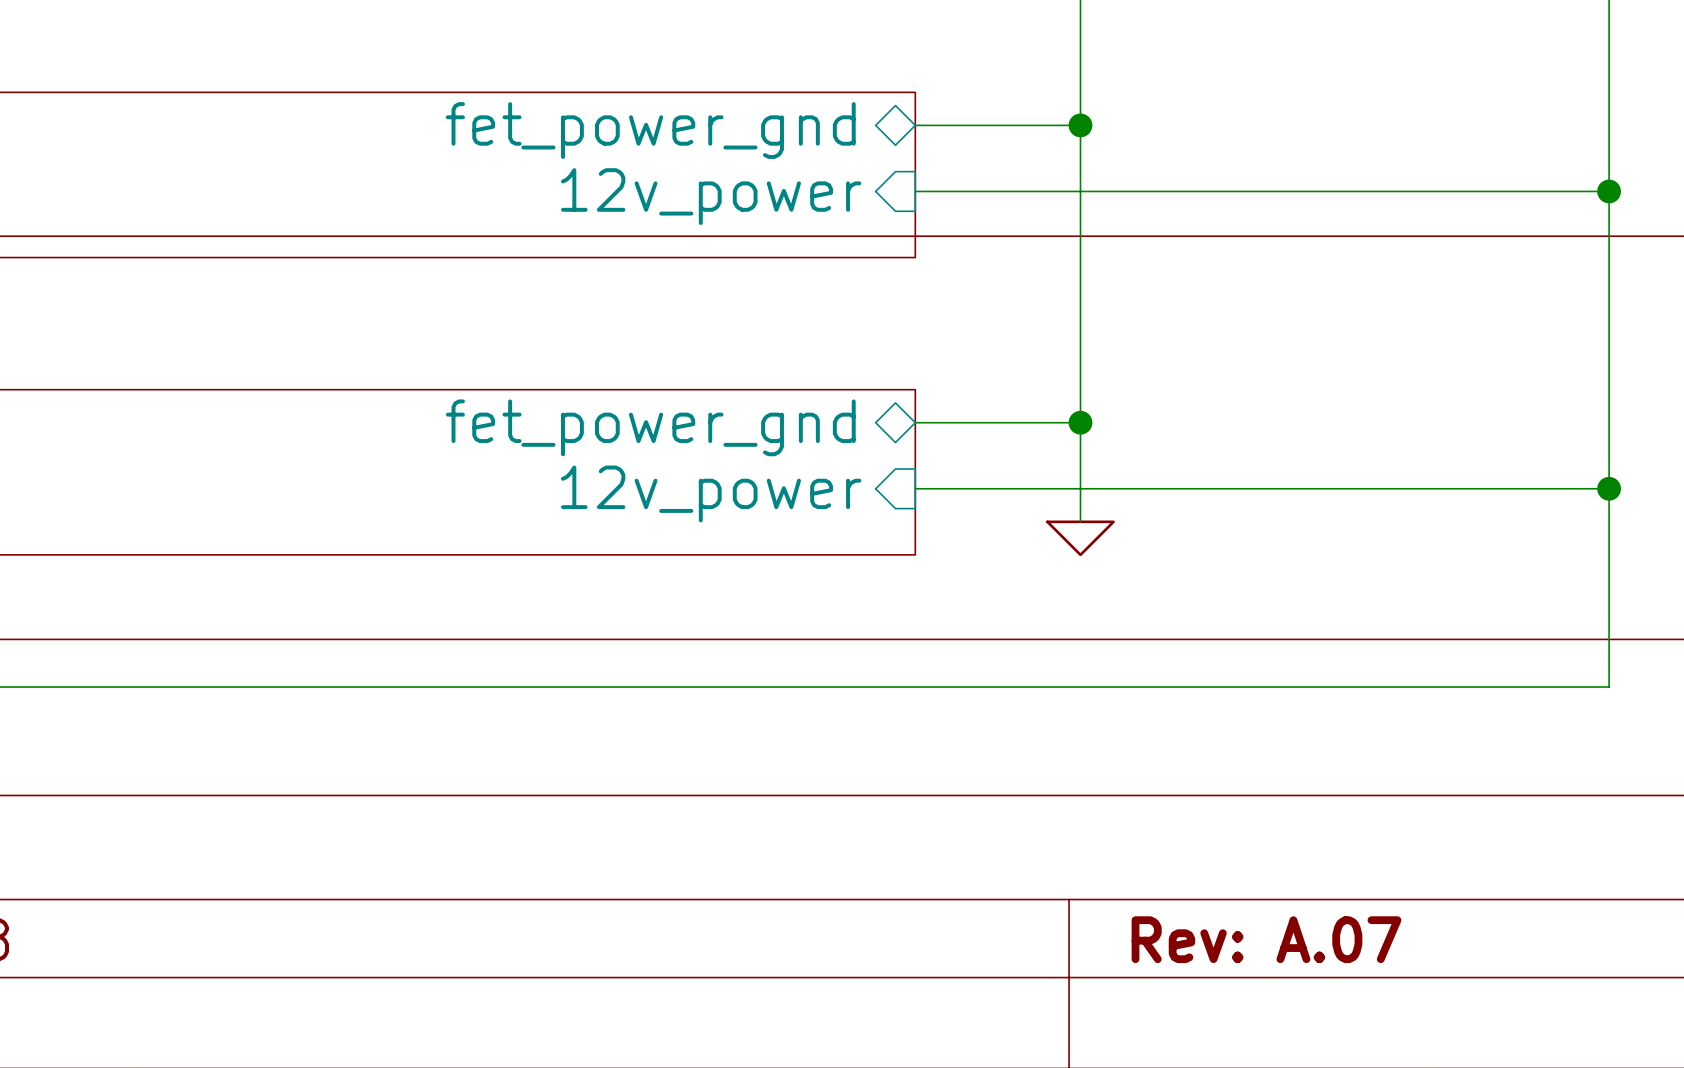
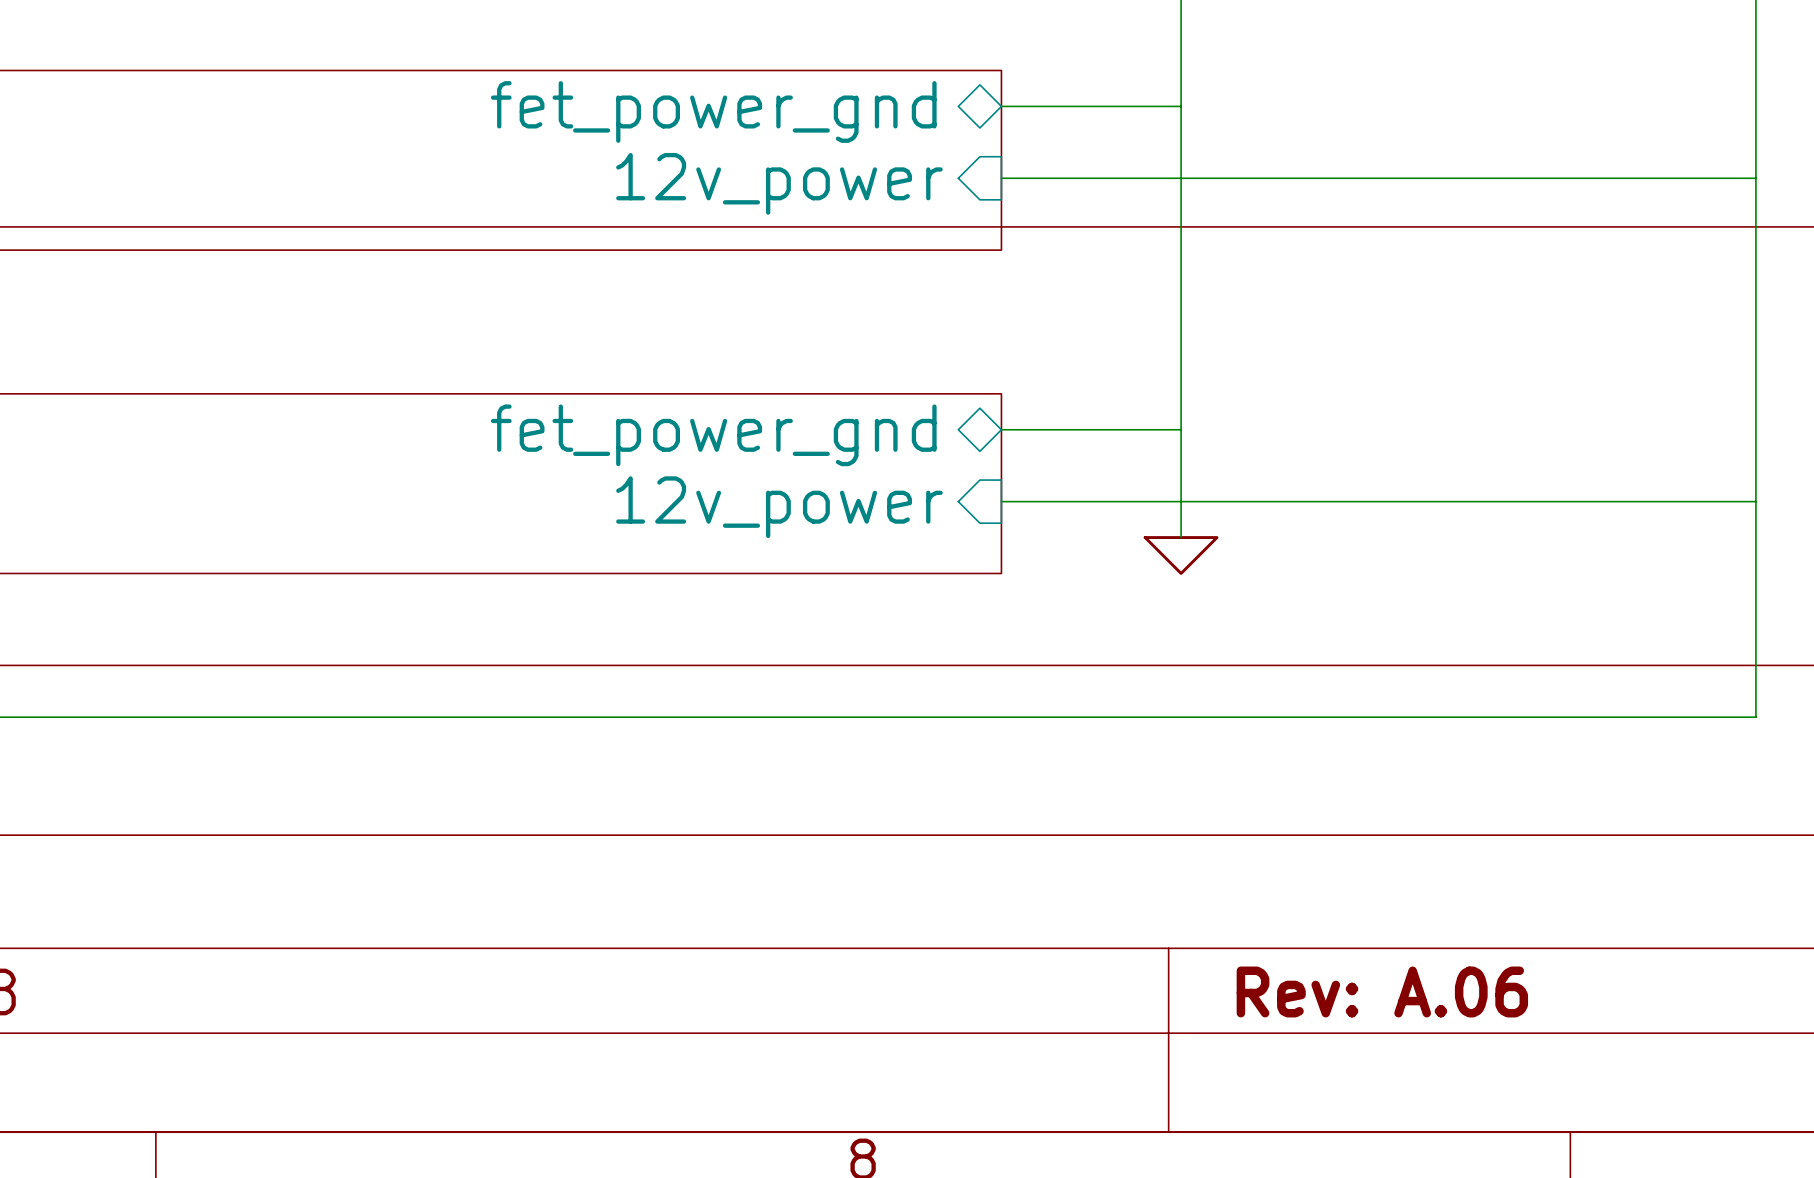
junction: (1080, 125) -> none
junction: (1609, 191) -> none
junction: (1080, 422) -> none
junction: (1609, 488) -> none
title block: Rev: A.07 (1266, 939) -> Rev: A.06 (1382, 991)

